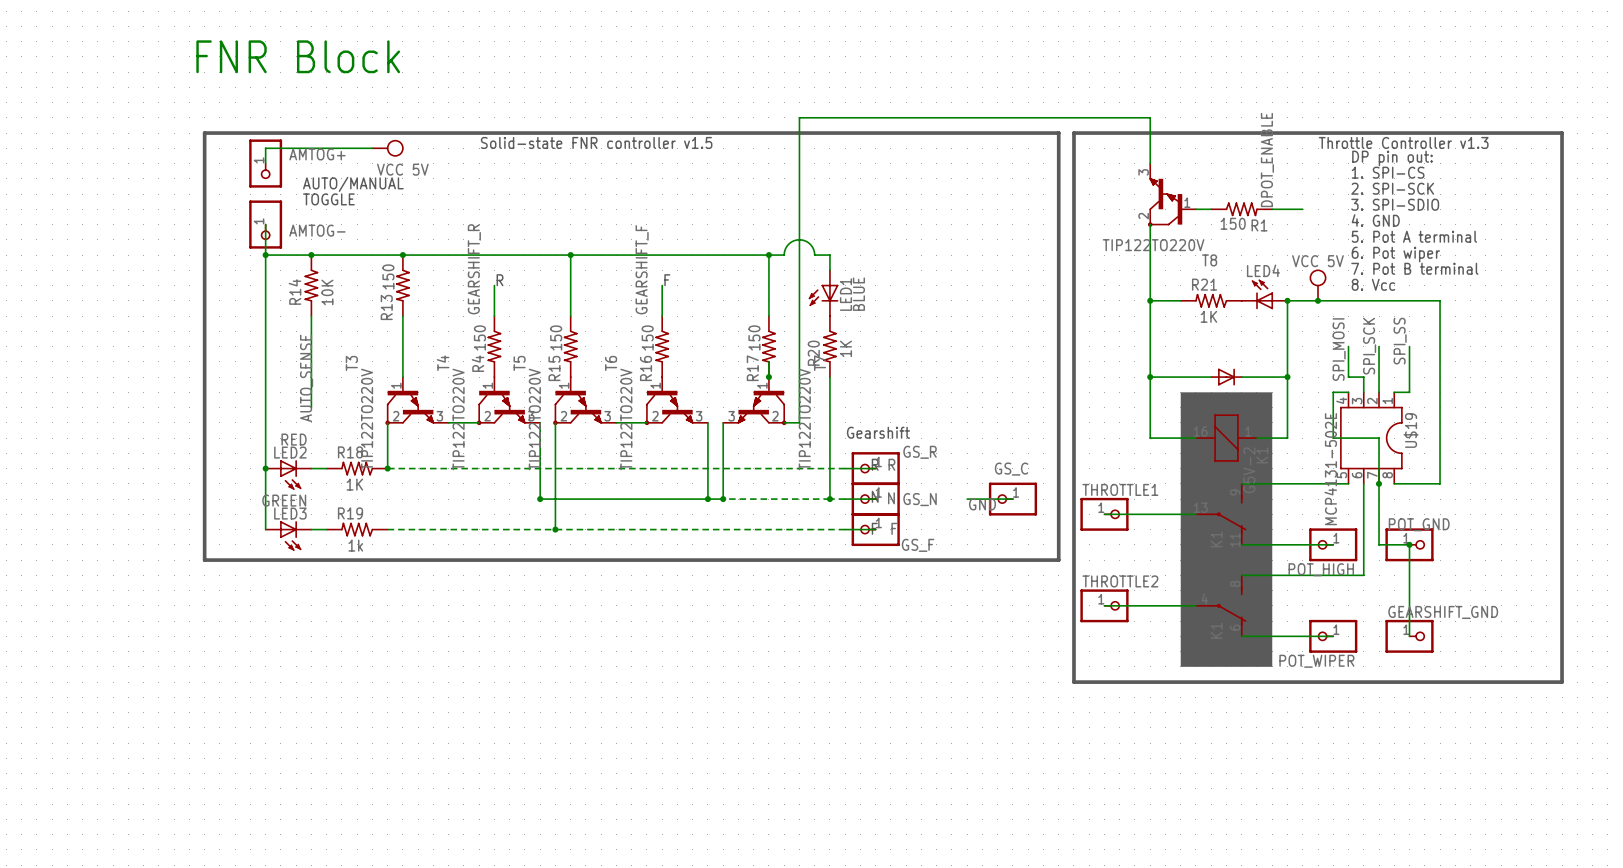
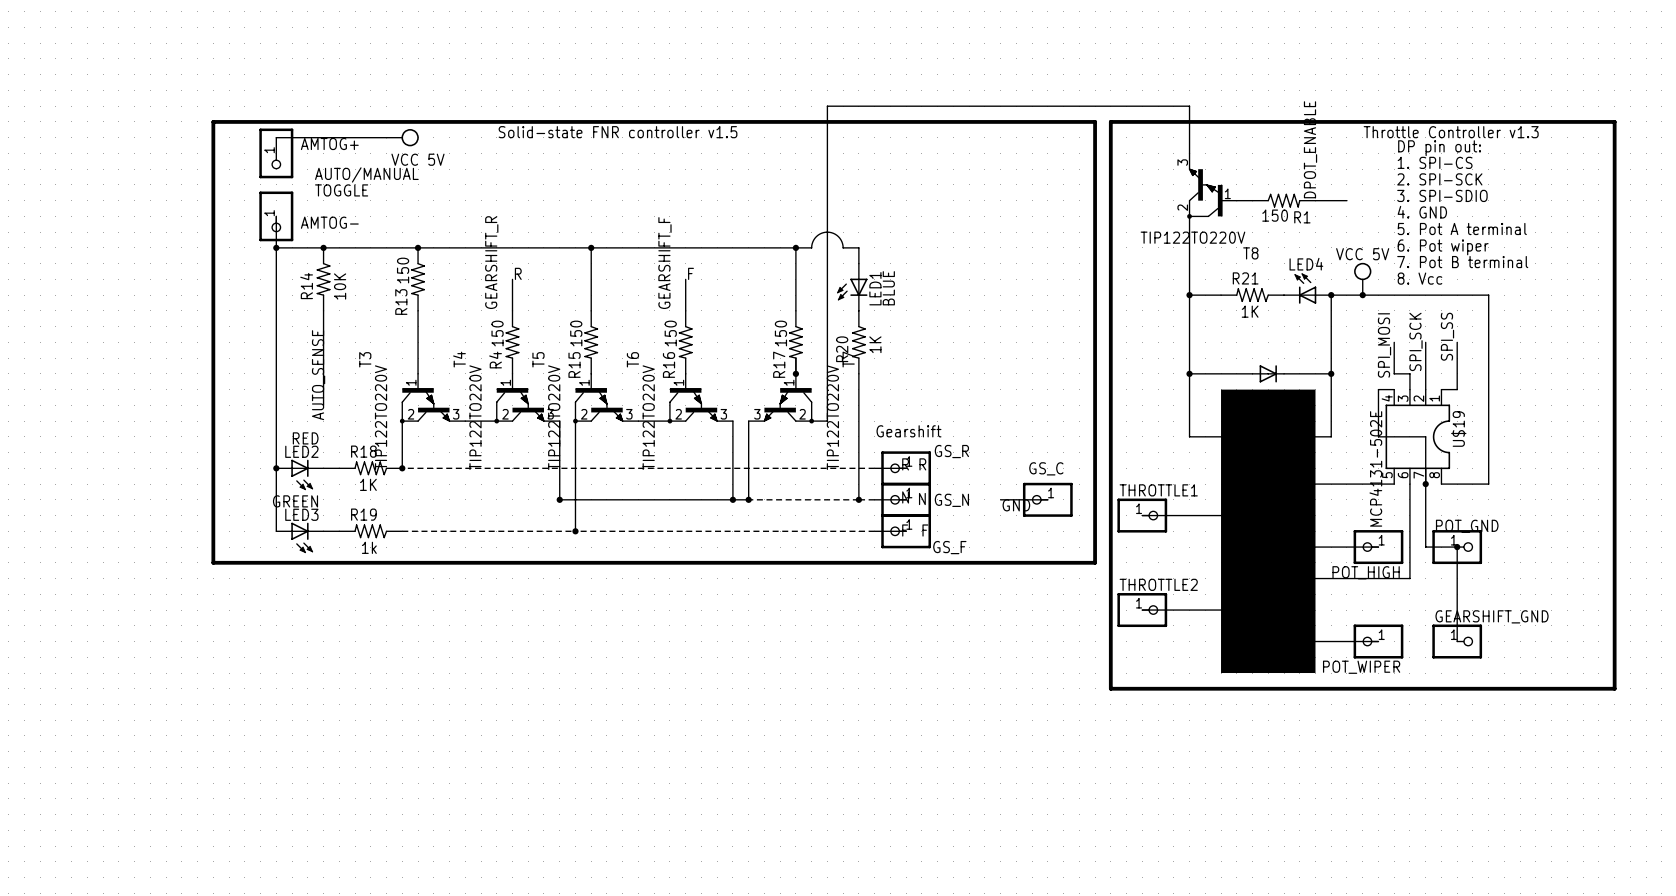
text: FNR Block (298, 56) -> none

